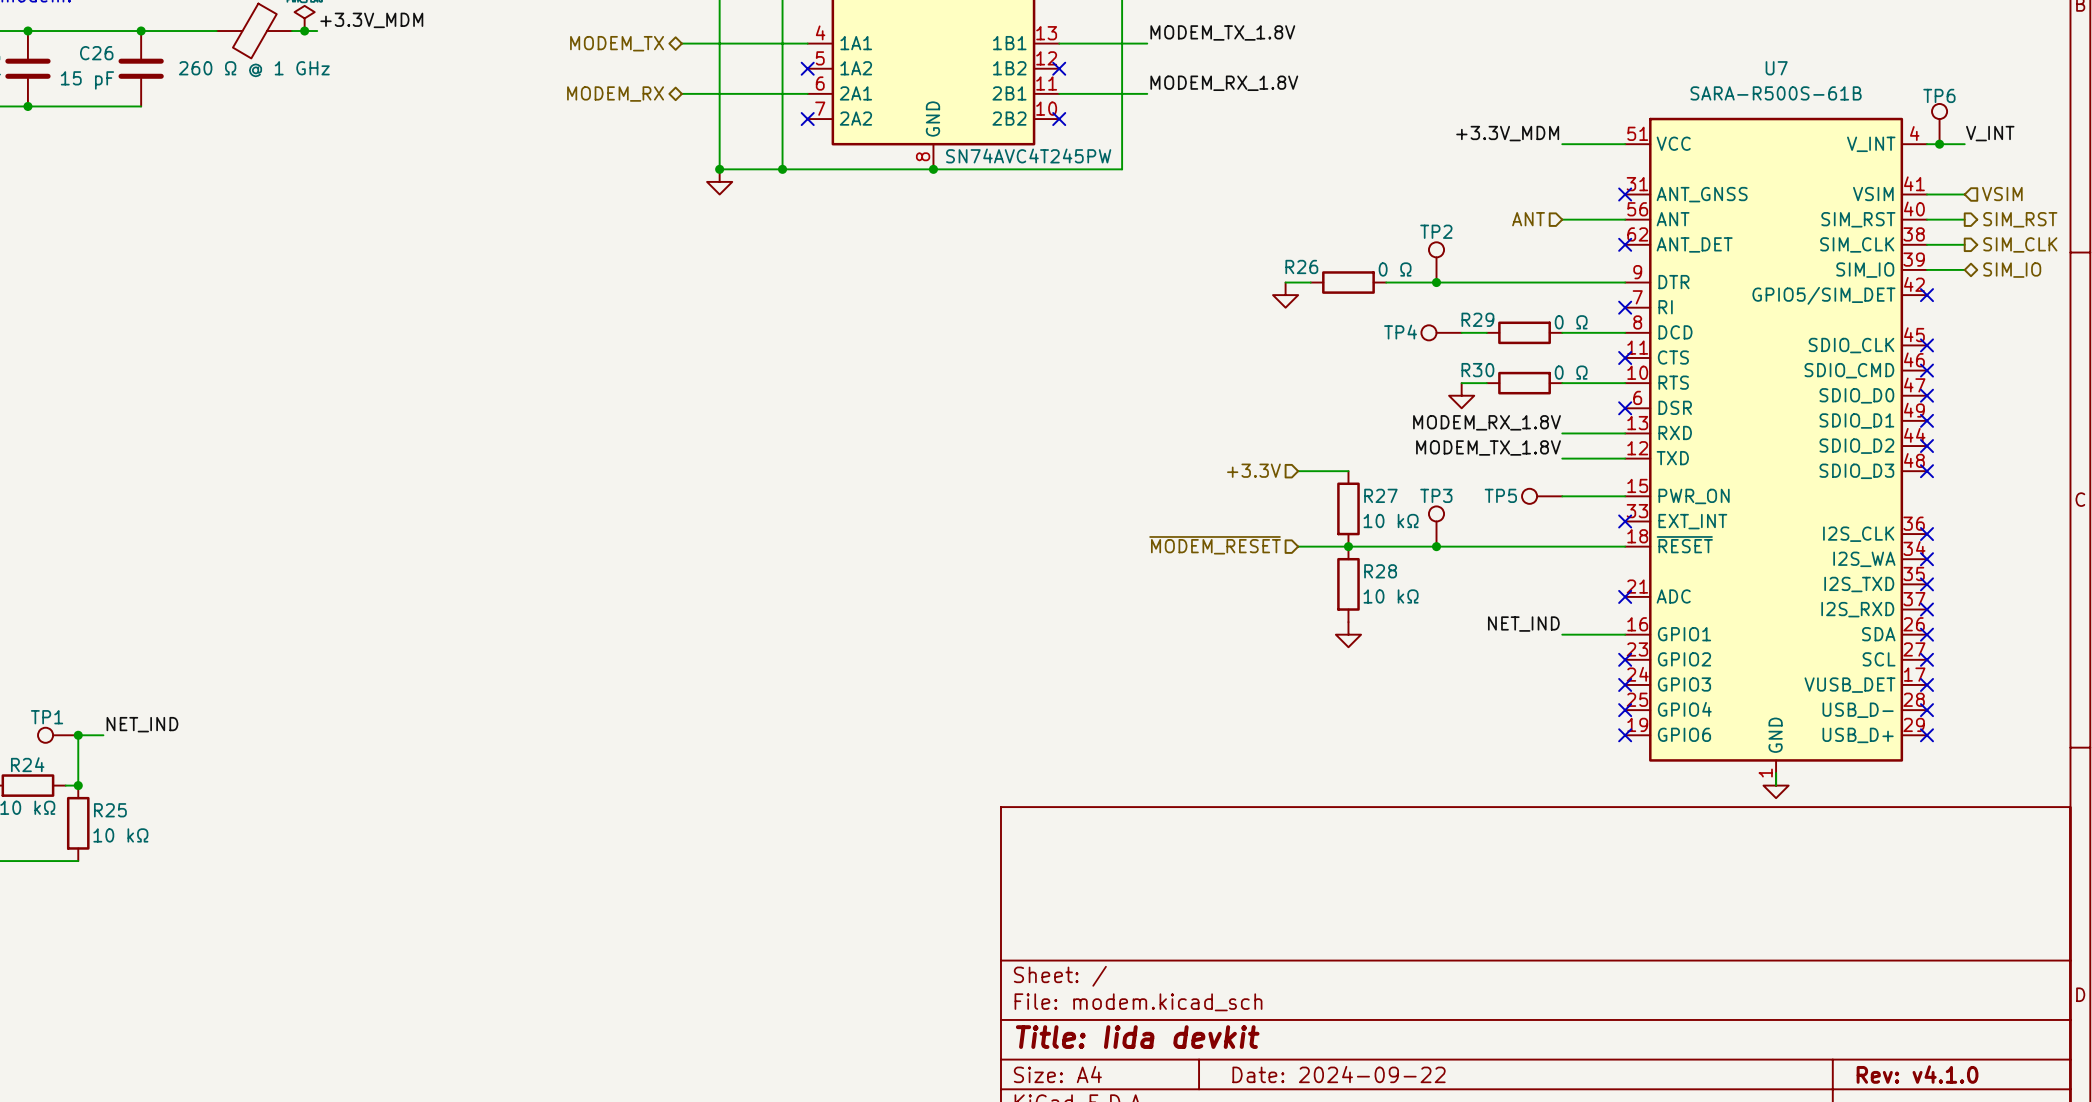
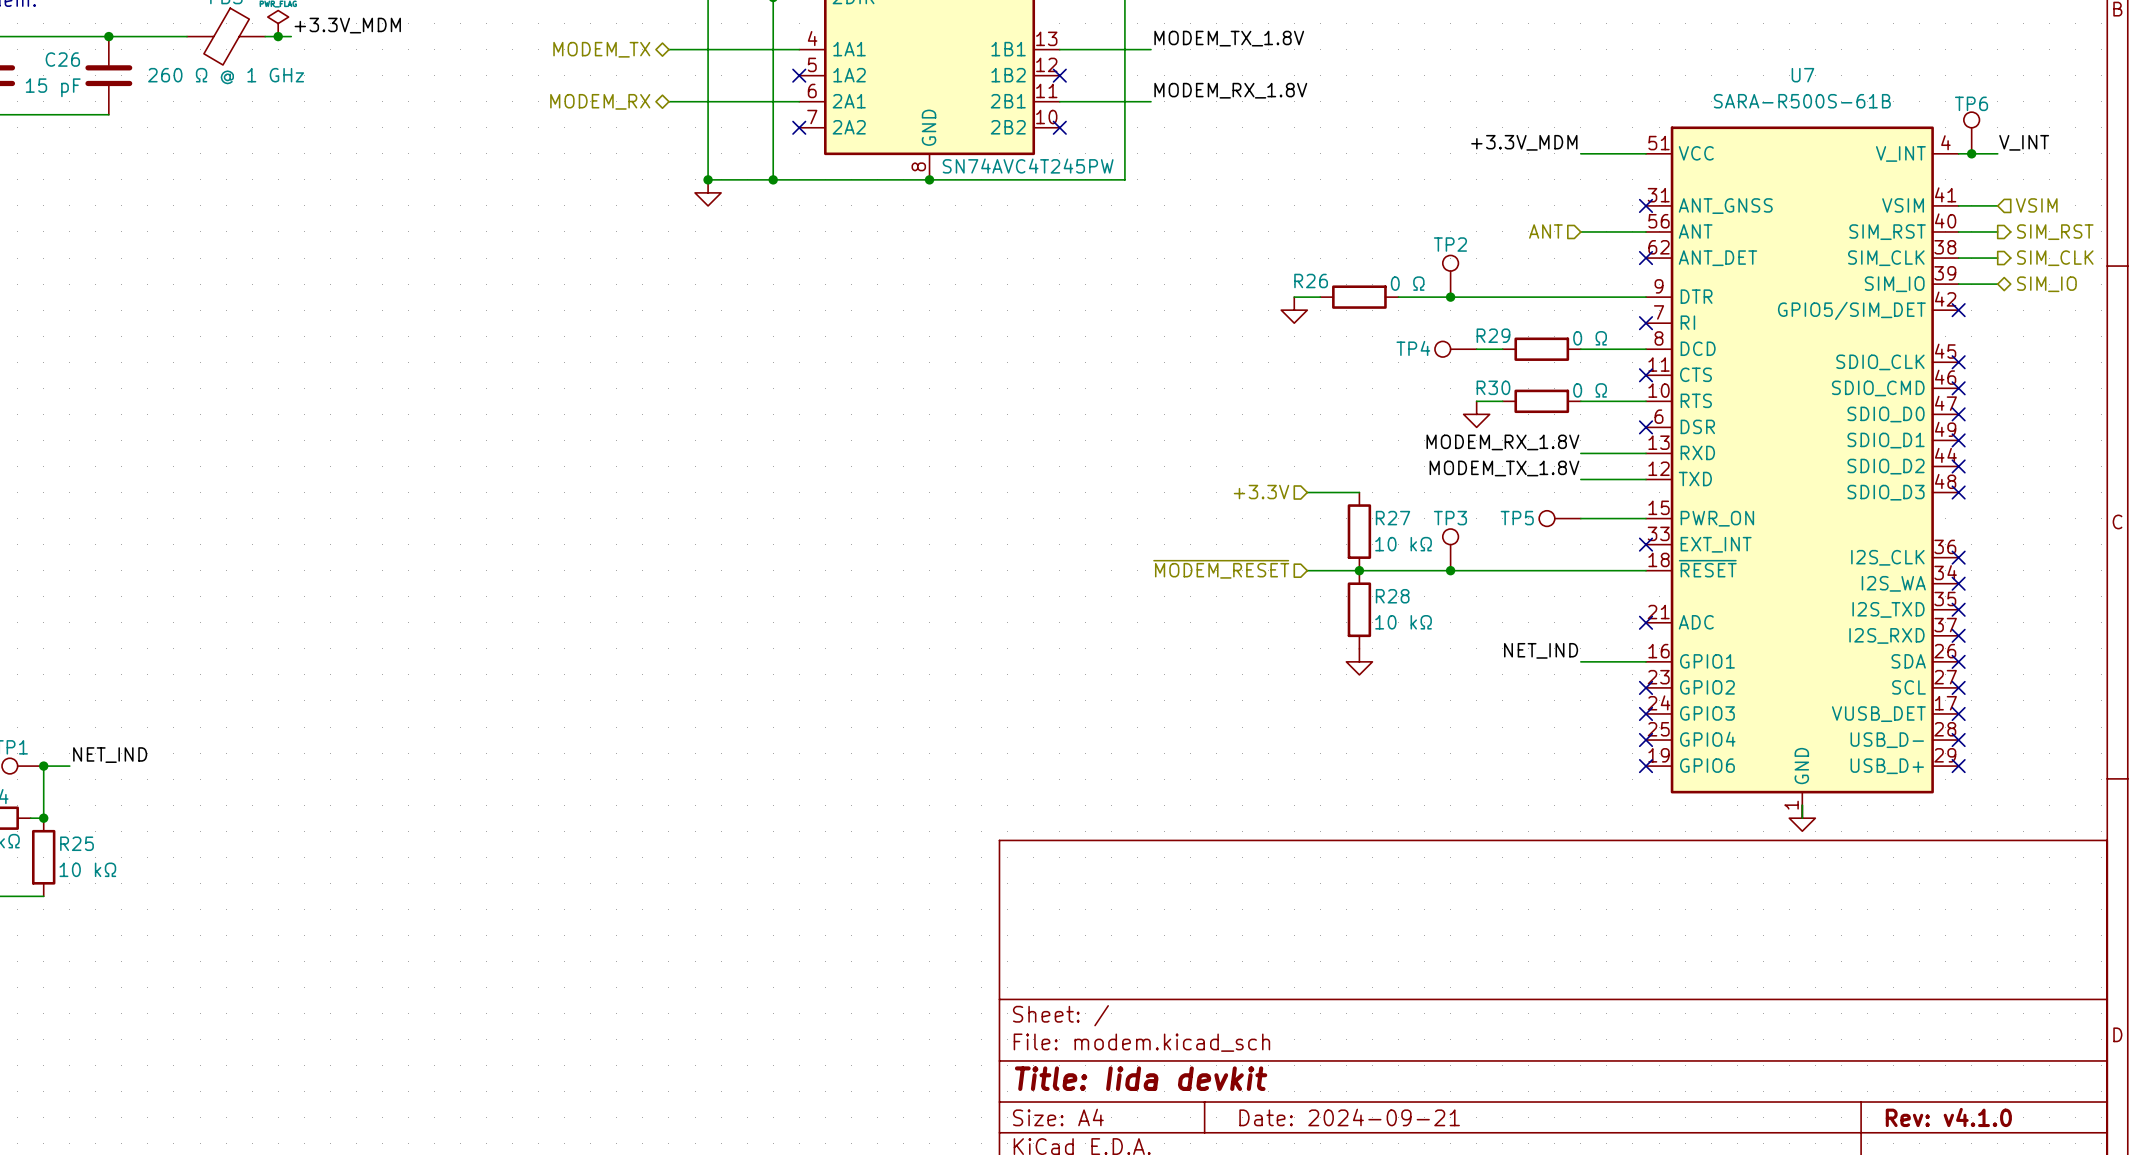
title block: Date: 2024-09-22 (1339, 1074) -> Date: 2024-09-21 (1349, 1117)

